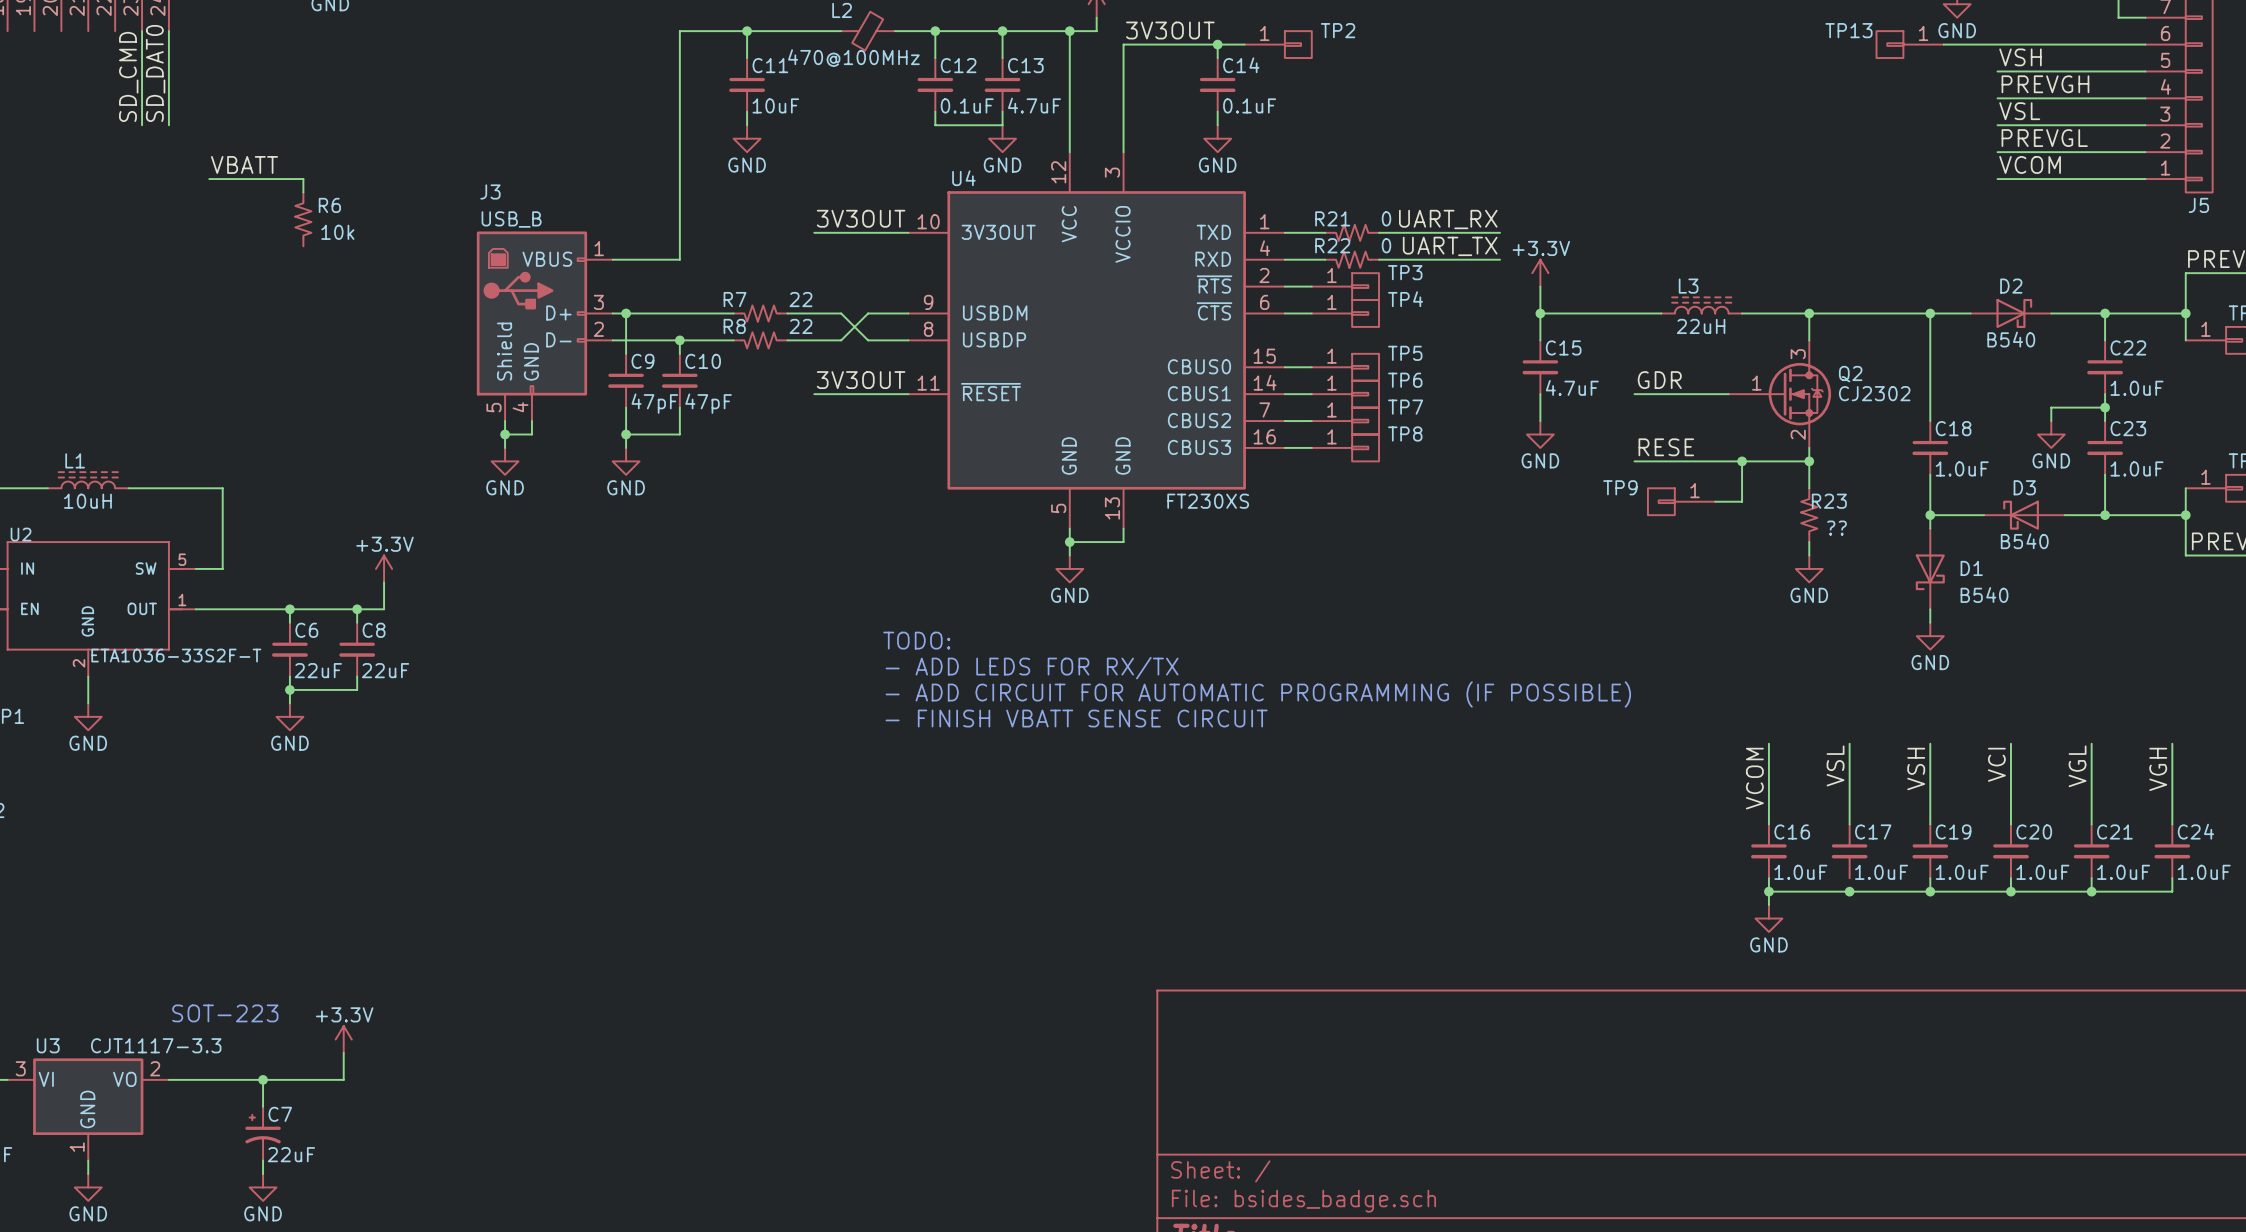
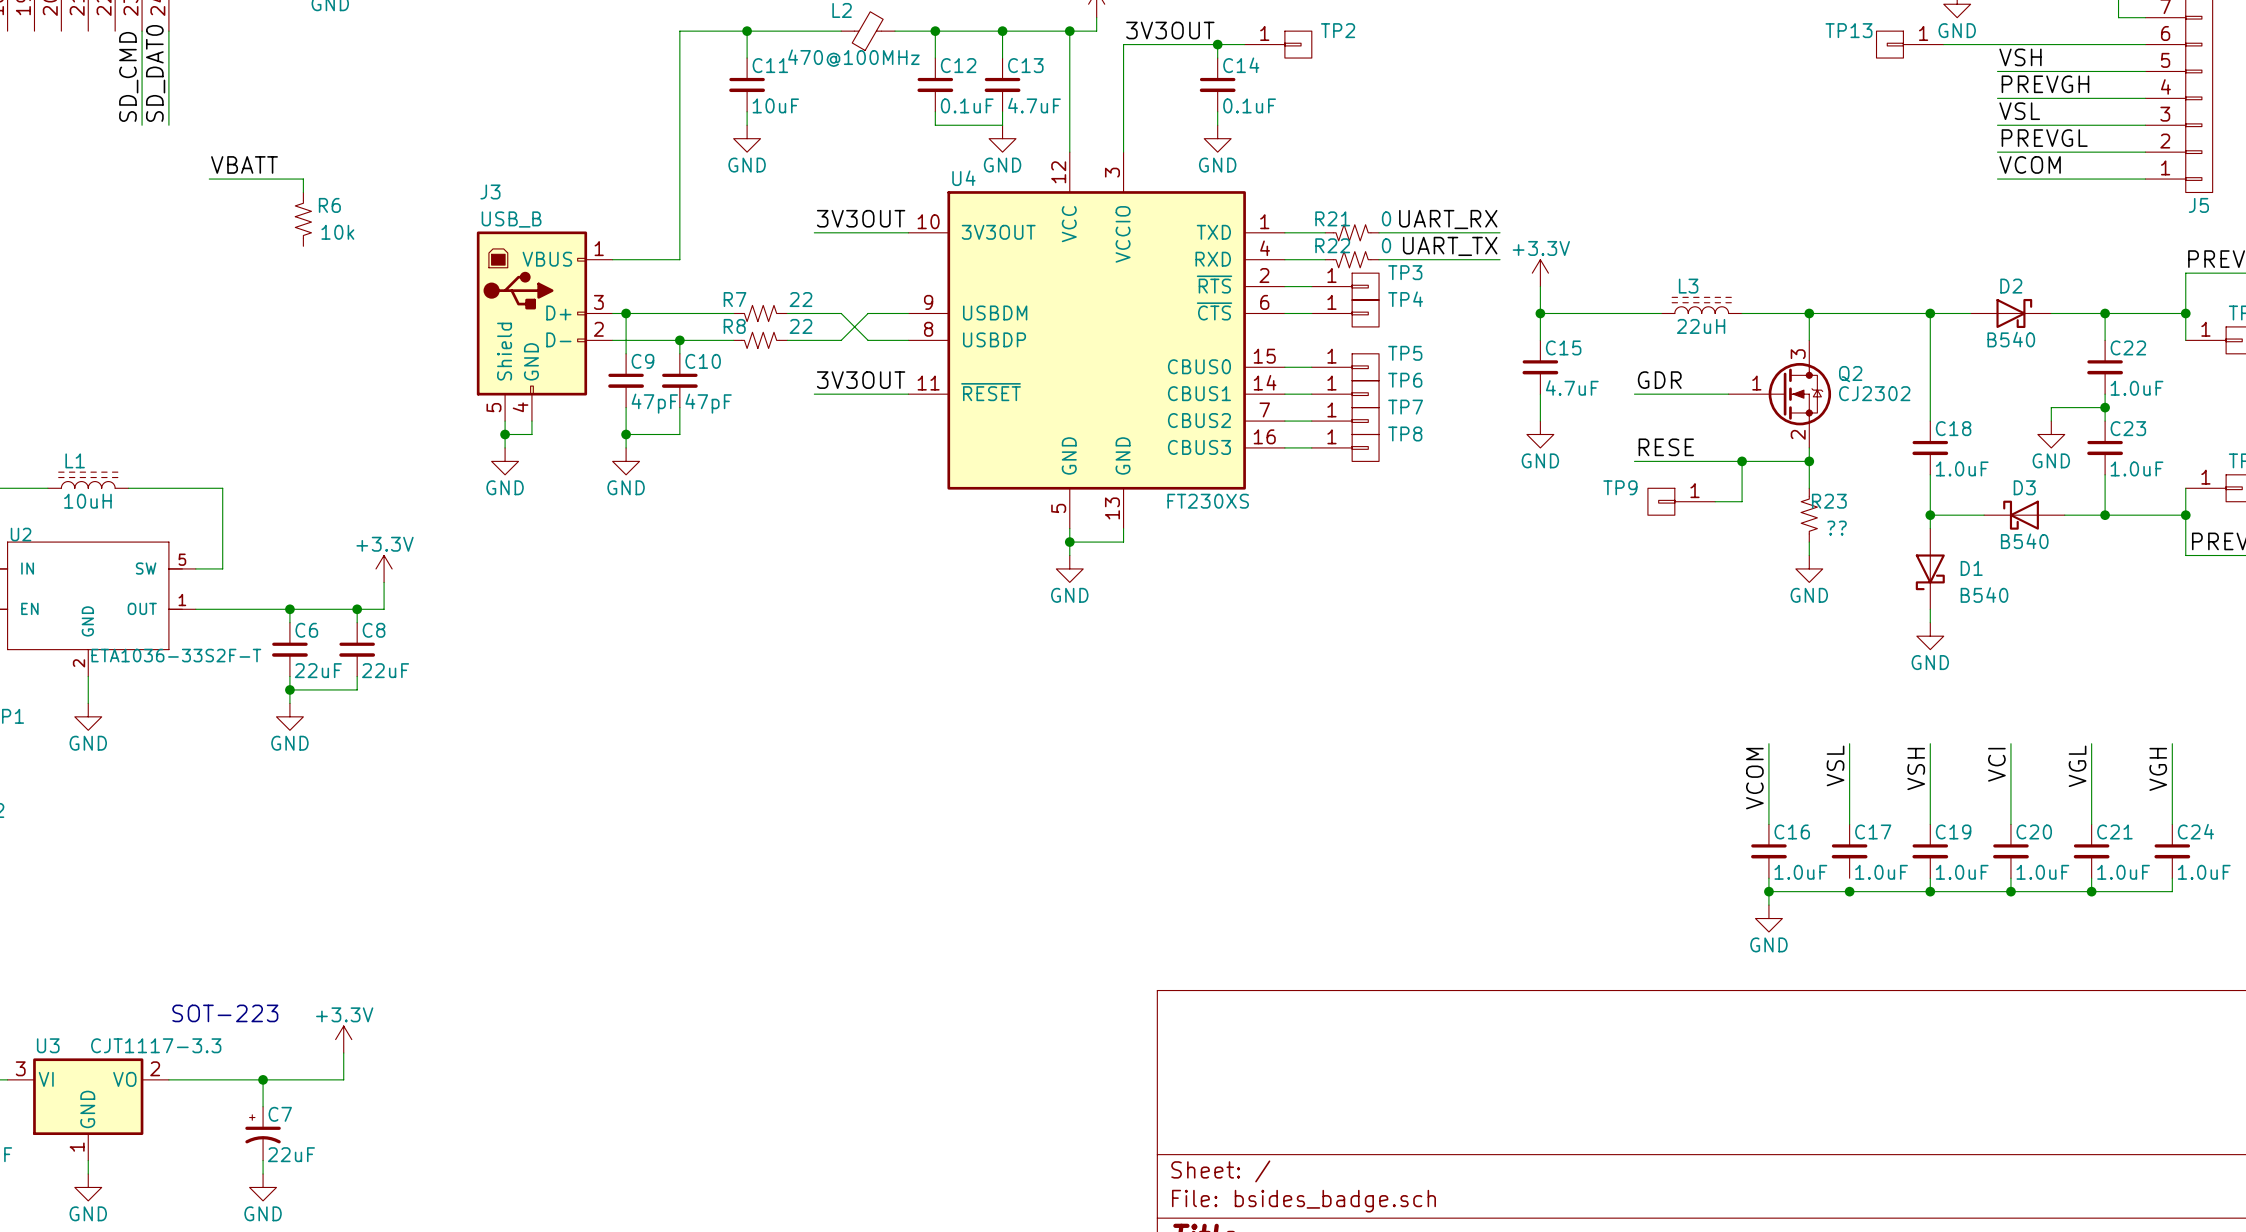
text: TODO: (916, 640) -> none
text: - ADD LEDS FOR RX/TX (1032, 668) -> none
text: - ADD CIRCUIT FOR AUTOMATIC PROGRAMMING (IF POSSIBLE) (1258, 694) -> none
text: - FINISH VBATT SENSE CIRCUIT (1076, 718) -> none

